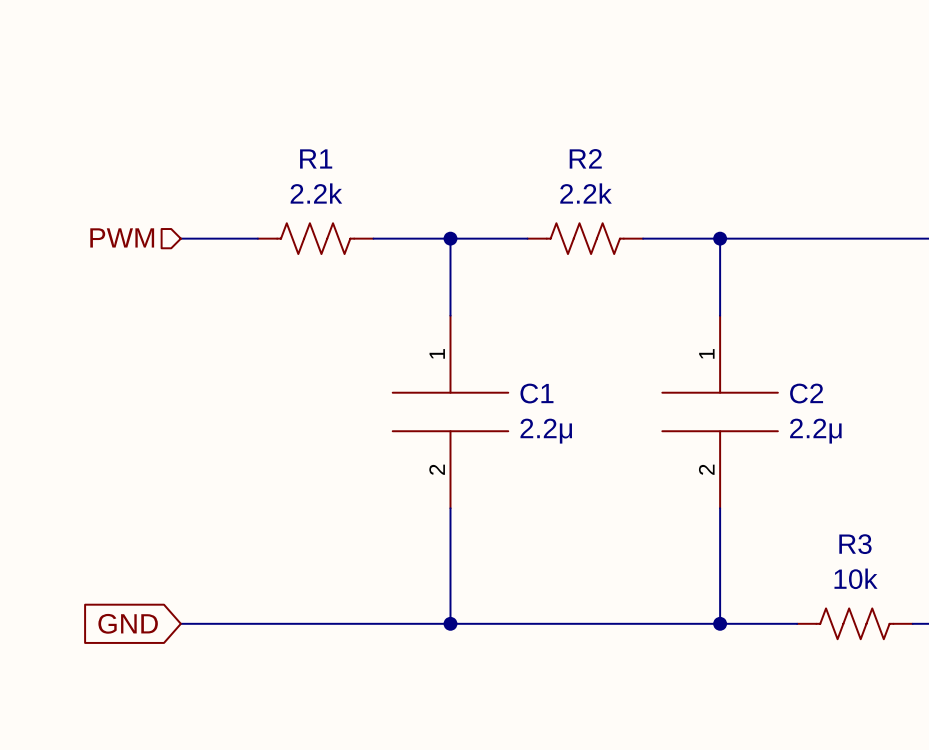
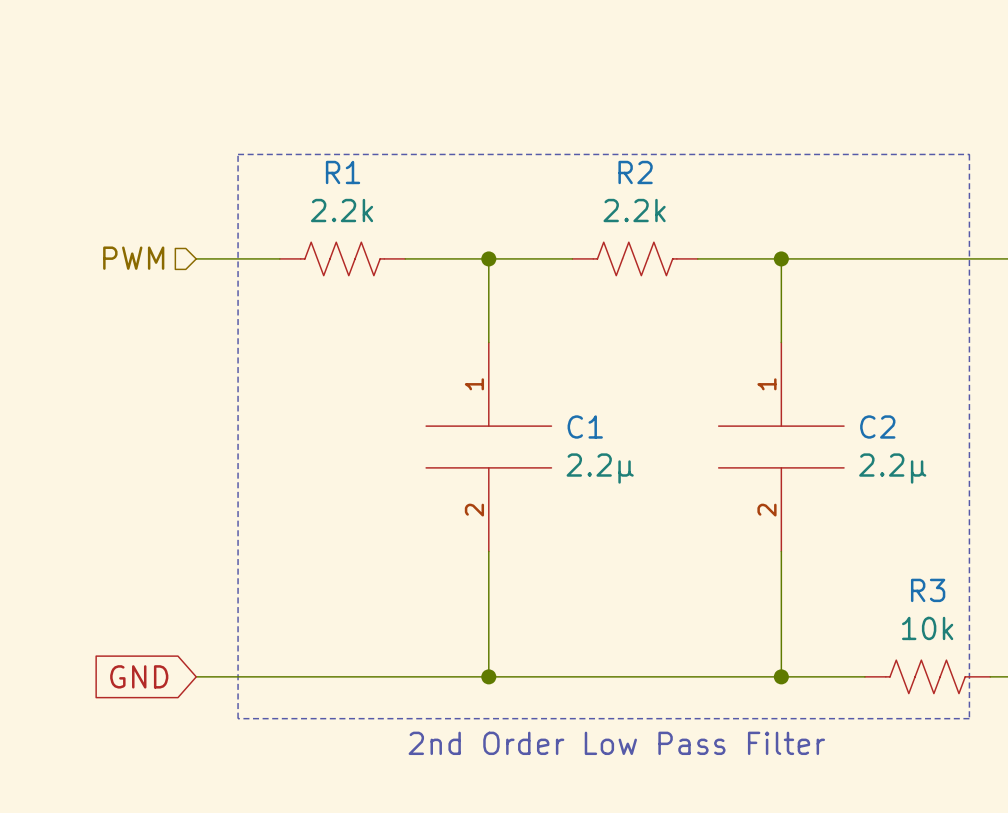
line: none -> (238, 154) (969, 154) (969, 718) (238, 718) (238, 154)
text: none -> 2nd Order Low Pass Filter (616, 743)

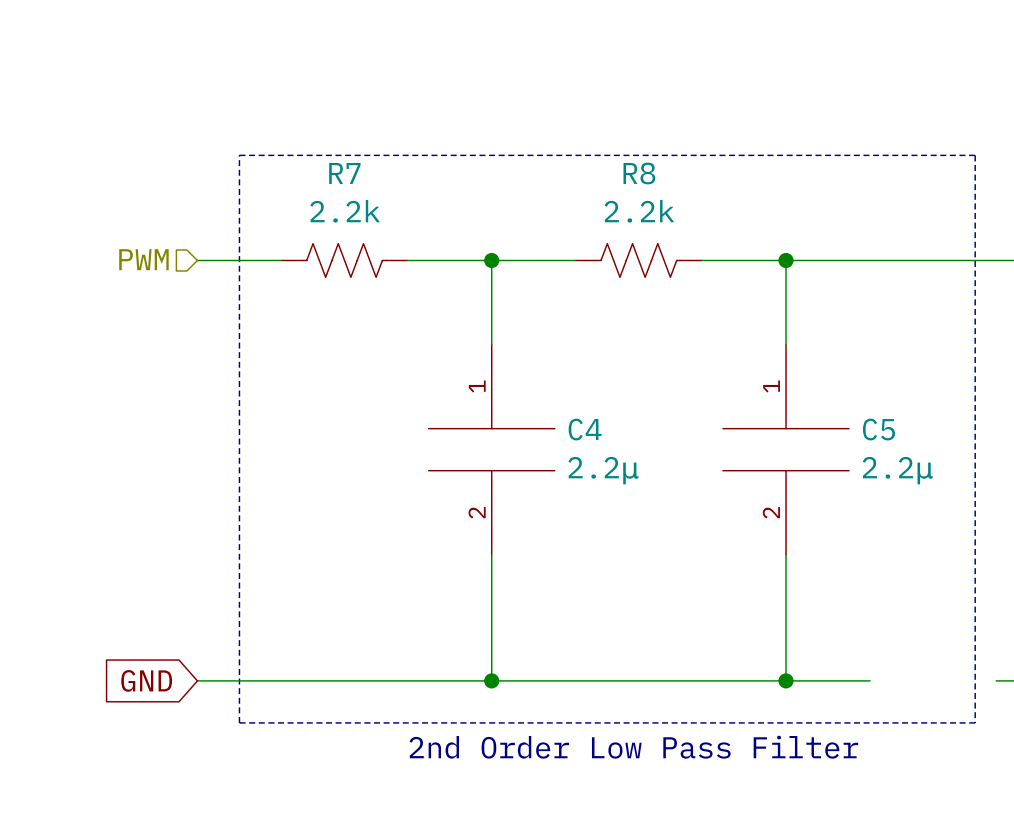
R1 name: R1 (343, 172) -> R7 (344, 173)
R2 name: R2 (635, 172) -> R8 (639, 173)
C1 name: C1 (585, 427) -> C4 (585, 429)
C2 name: C2 (877, 427) -> C5 (878, 429)
R3: 10k (927, 676) -> none

